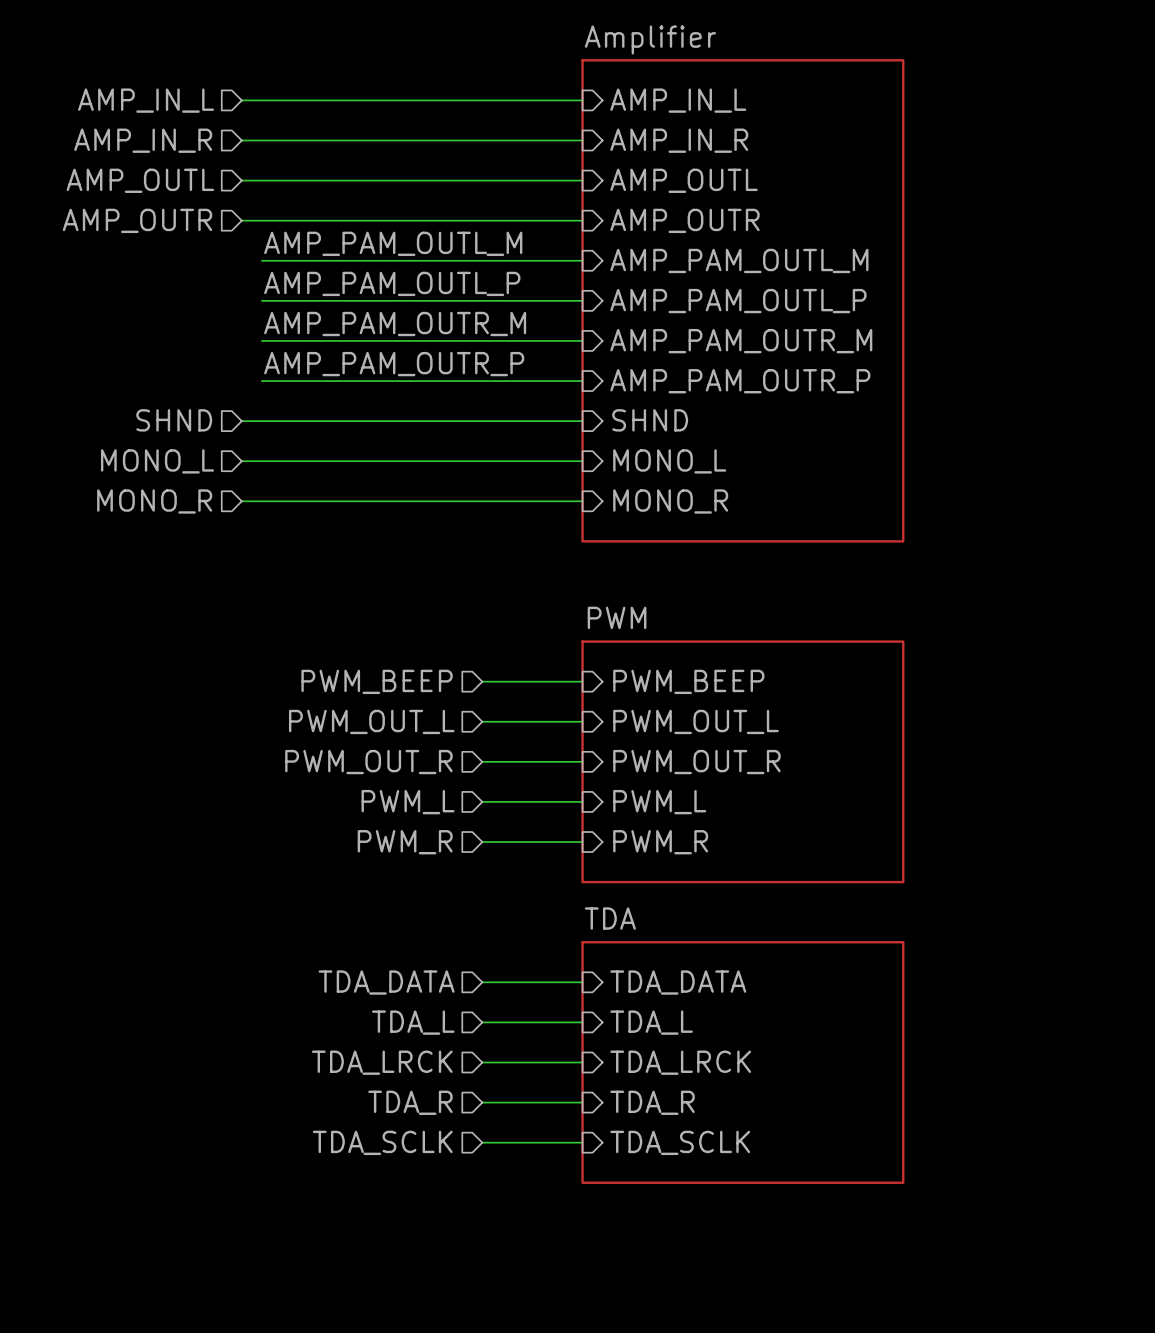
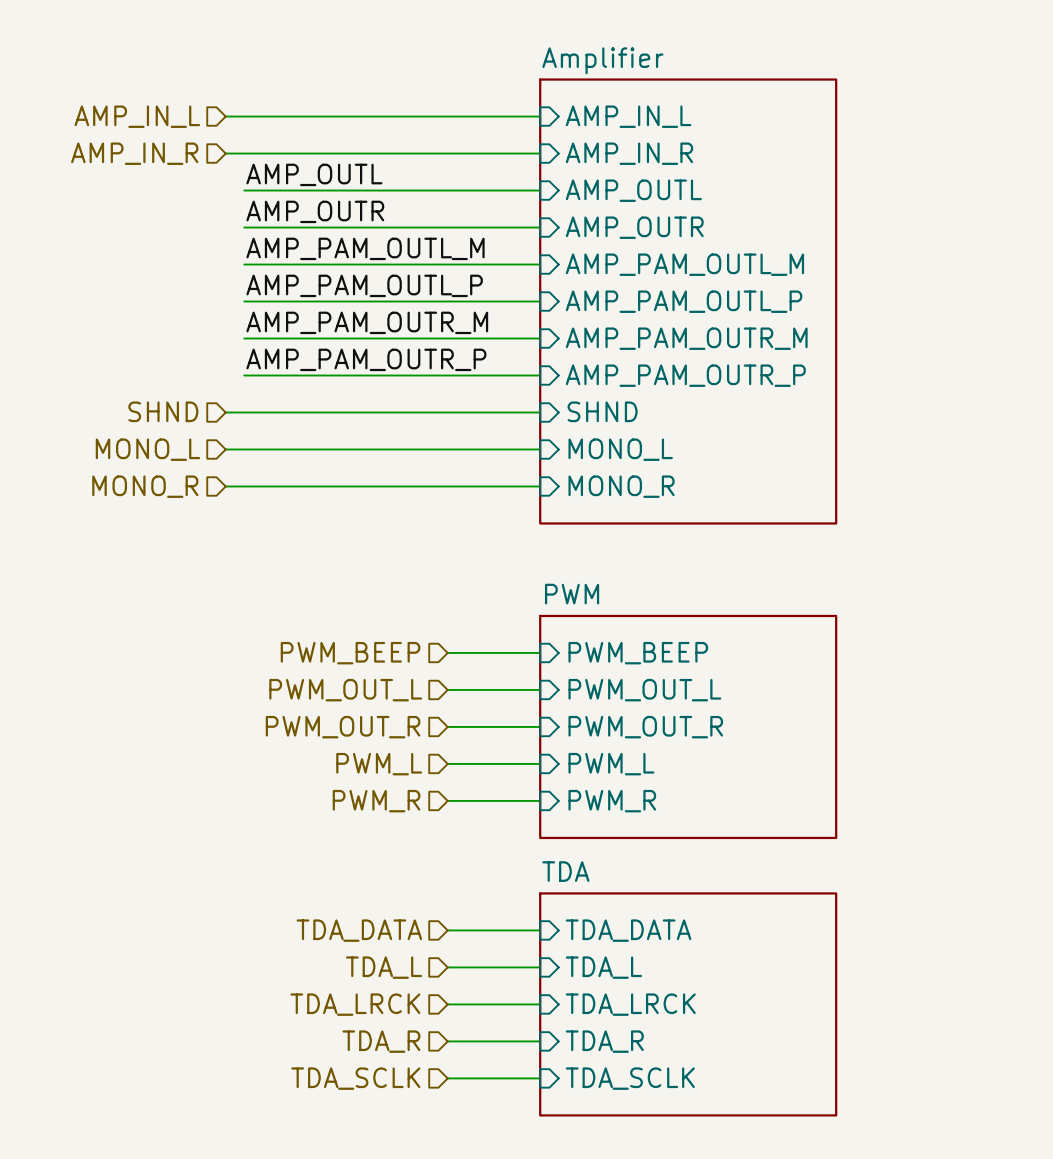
label: none -> AMP_OUTL (314, 174)
hierarchical label: AMP_OUTL (140, 180) -> none
wire: (241, 180) (261, 180) -> none
label: none -> AMP_OUTR (315, 211)
hierarchical label: AMP_OUTR (137, 220) -> none
wire: (241, 220) (261, 220) -> none

